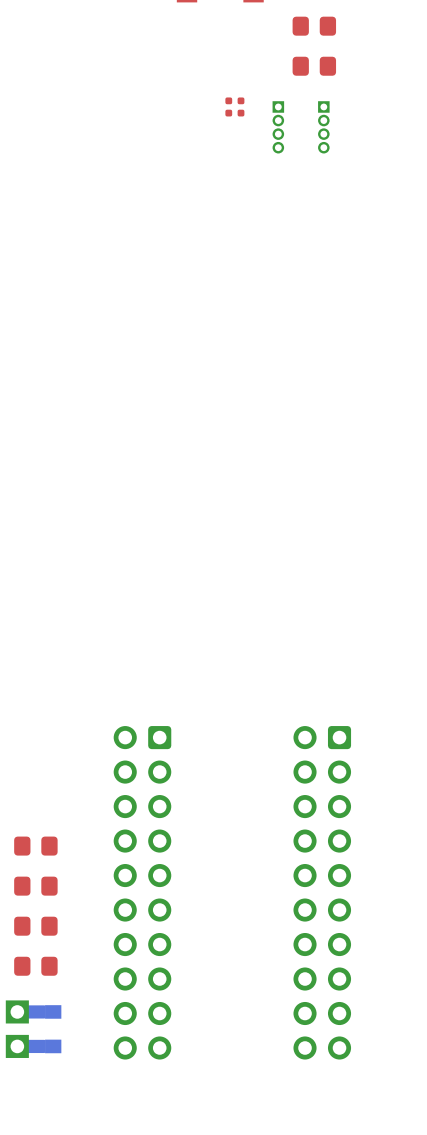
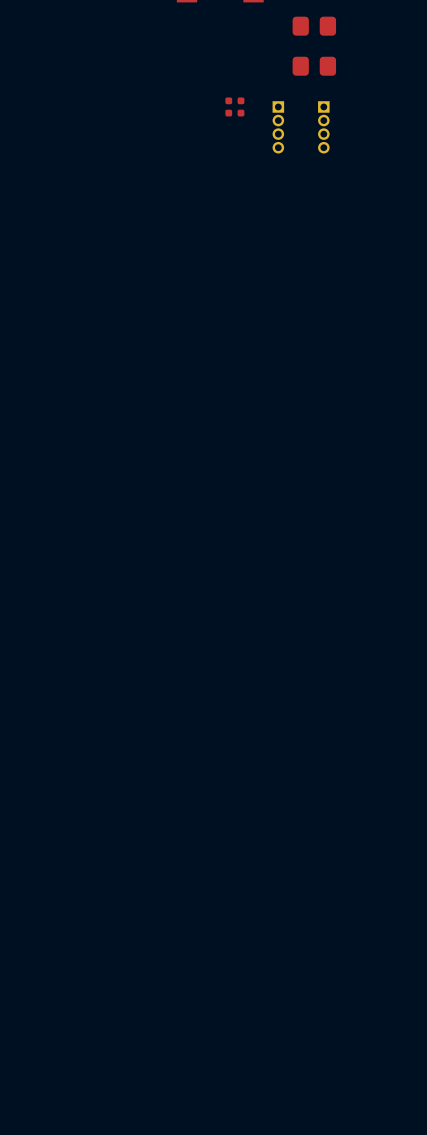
part: (35, 846) -> none
part: (35, 886) -> none
part: (142, 892) -> none
part: (322, 892) -> none
part: (35, 926) -> none
part: (35, 966) -> none
part: (33, 1029) -> none

